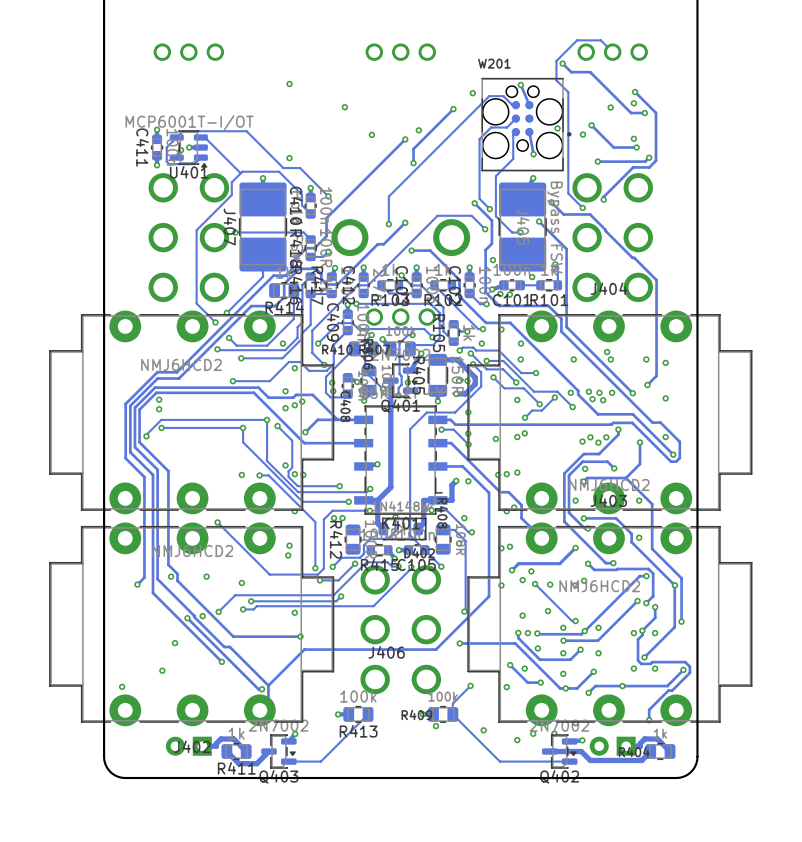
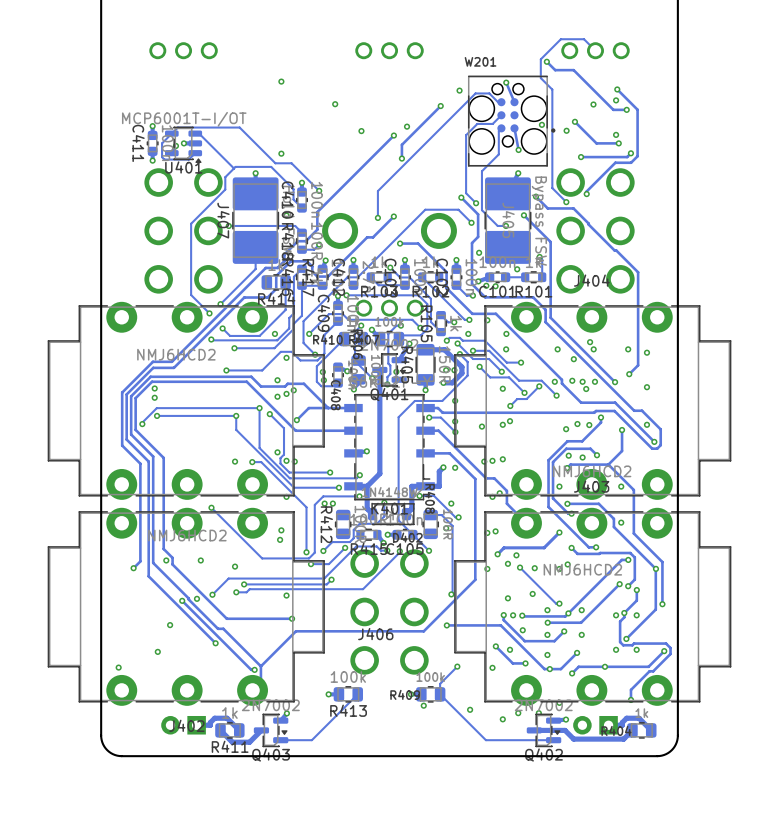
via: none -> (573, 359)
via: (592, 399) -> none
via: none -> (577, 424)
via: (590, 437) -> none
via: (598, 442) -> none
via: none -> (582, 457)

